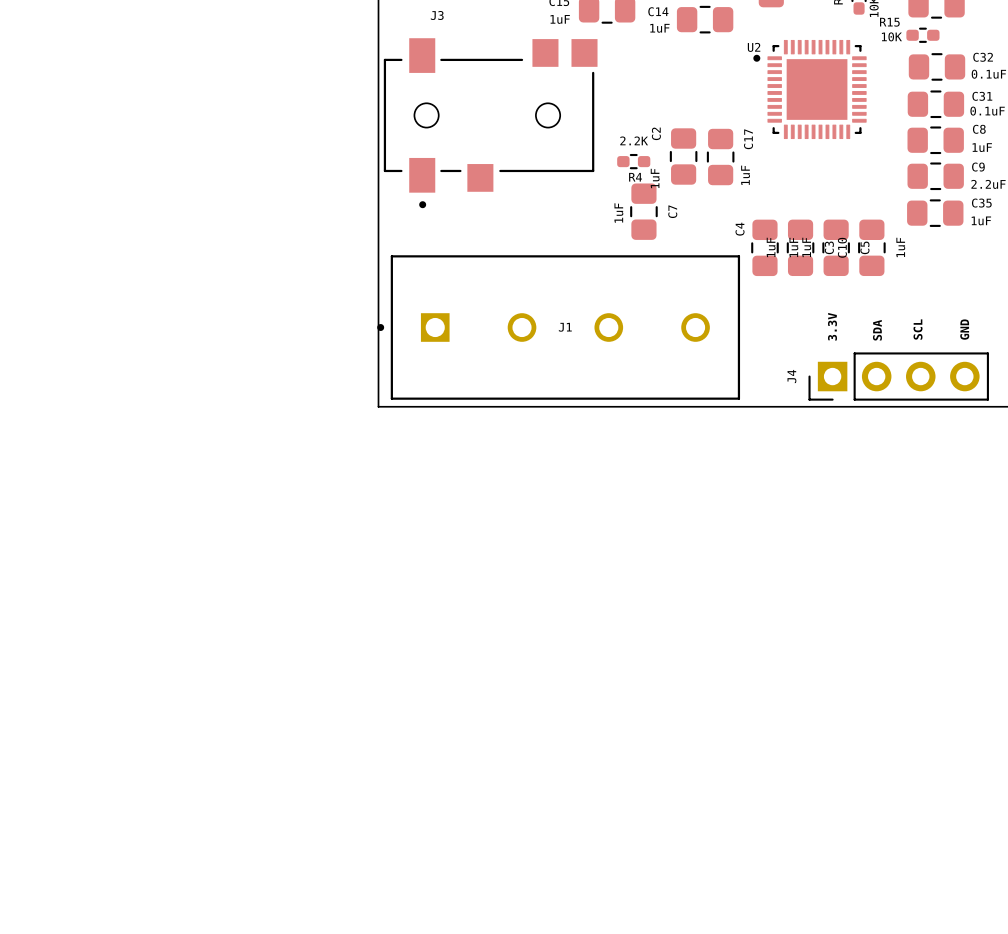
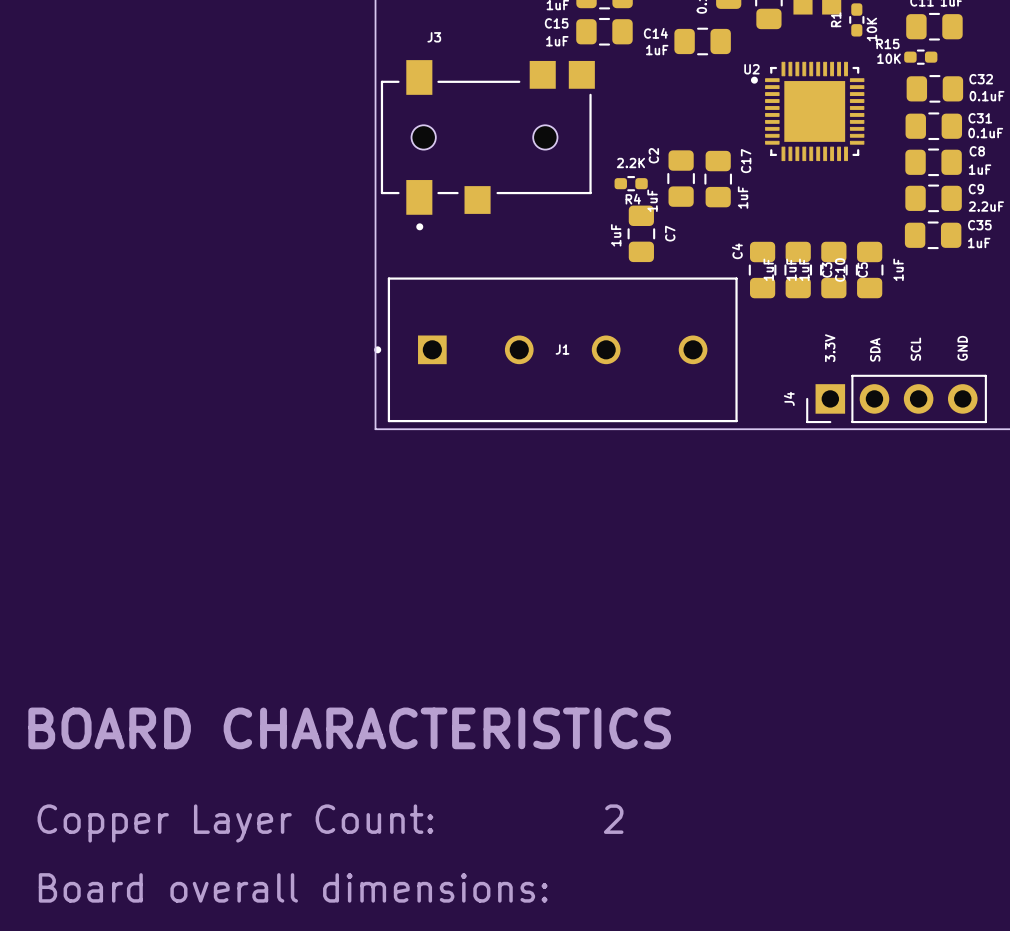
text: none -> BOARD CHARACTERISTICS (349, 728)
text: none -> 2 (613, 819)
text: none -> Copper Layer Count: (235, 823)
text: none -> Board overall dimensions: (293, 887)

